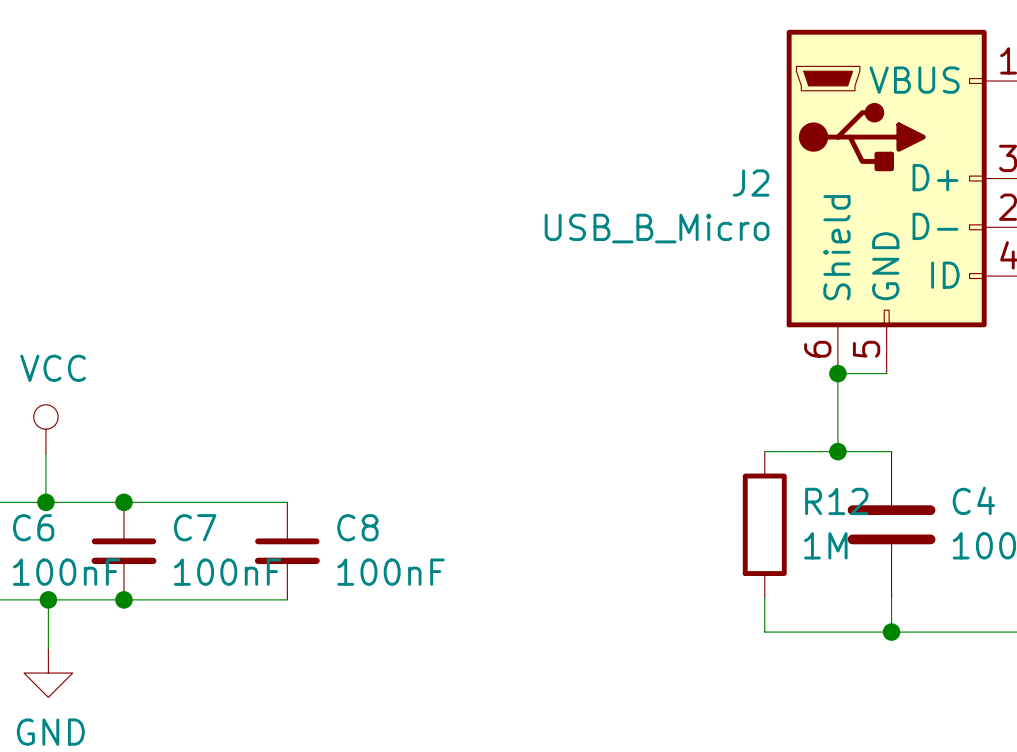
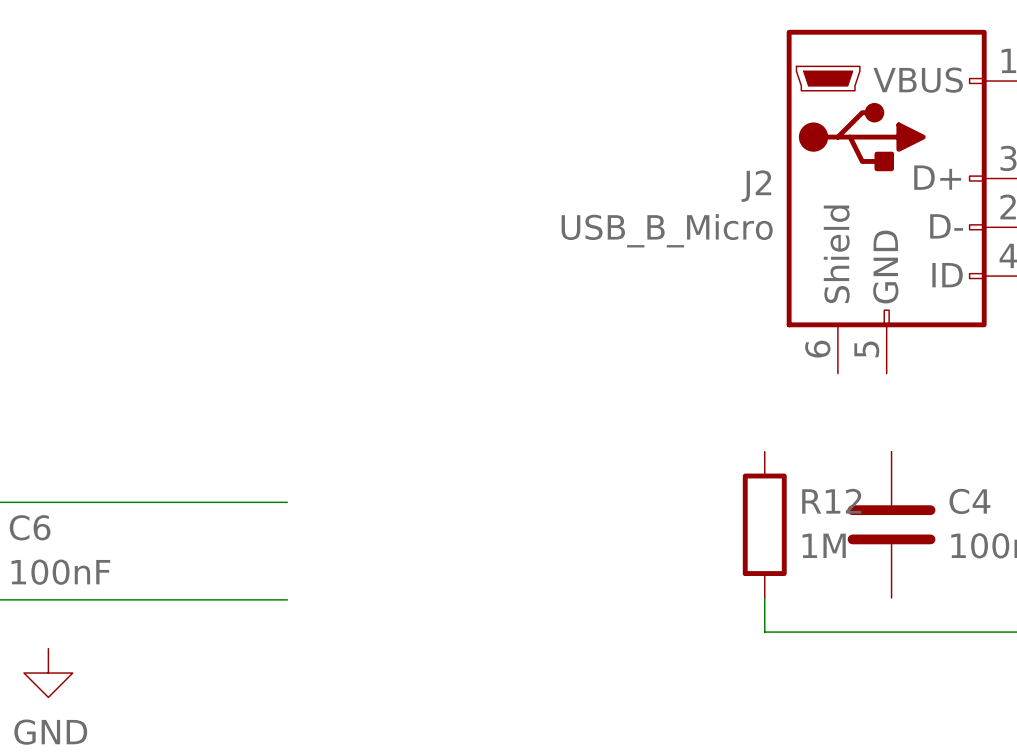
junction: (837, 373) -> none
wire: (886, 373) (837, 373) (837, 451) -> none
power symbol: VCC (45, 429) -> none
wire: (764, 451) (891, 451) -> none
junction: (837, 451) -> none
wire: (45, 453) (45, 502) -> none
junction: (45, 502) -> none
junction: (123, 502) -> none
C7: 100nF (123, 551) -> none
C8: 100nF (287, 551) -> none
wire: (891, 597) (891, 632) -> none
wire: (48, 599) (48, 648) -> none
junction: (48, 599) -> none
junction: (123, 599) -> none
junction: (891, 632) -> none

